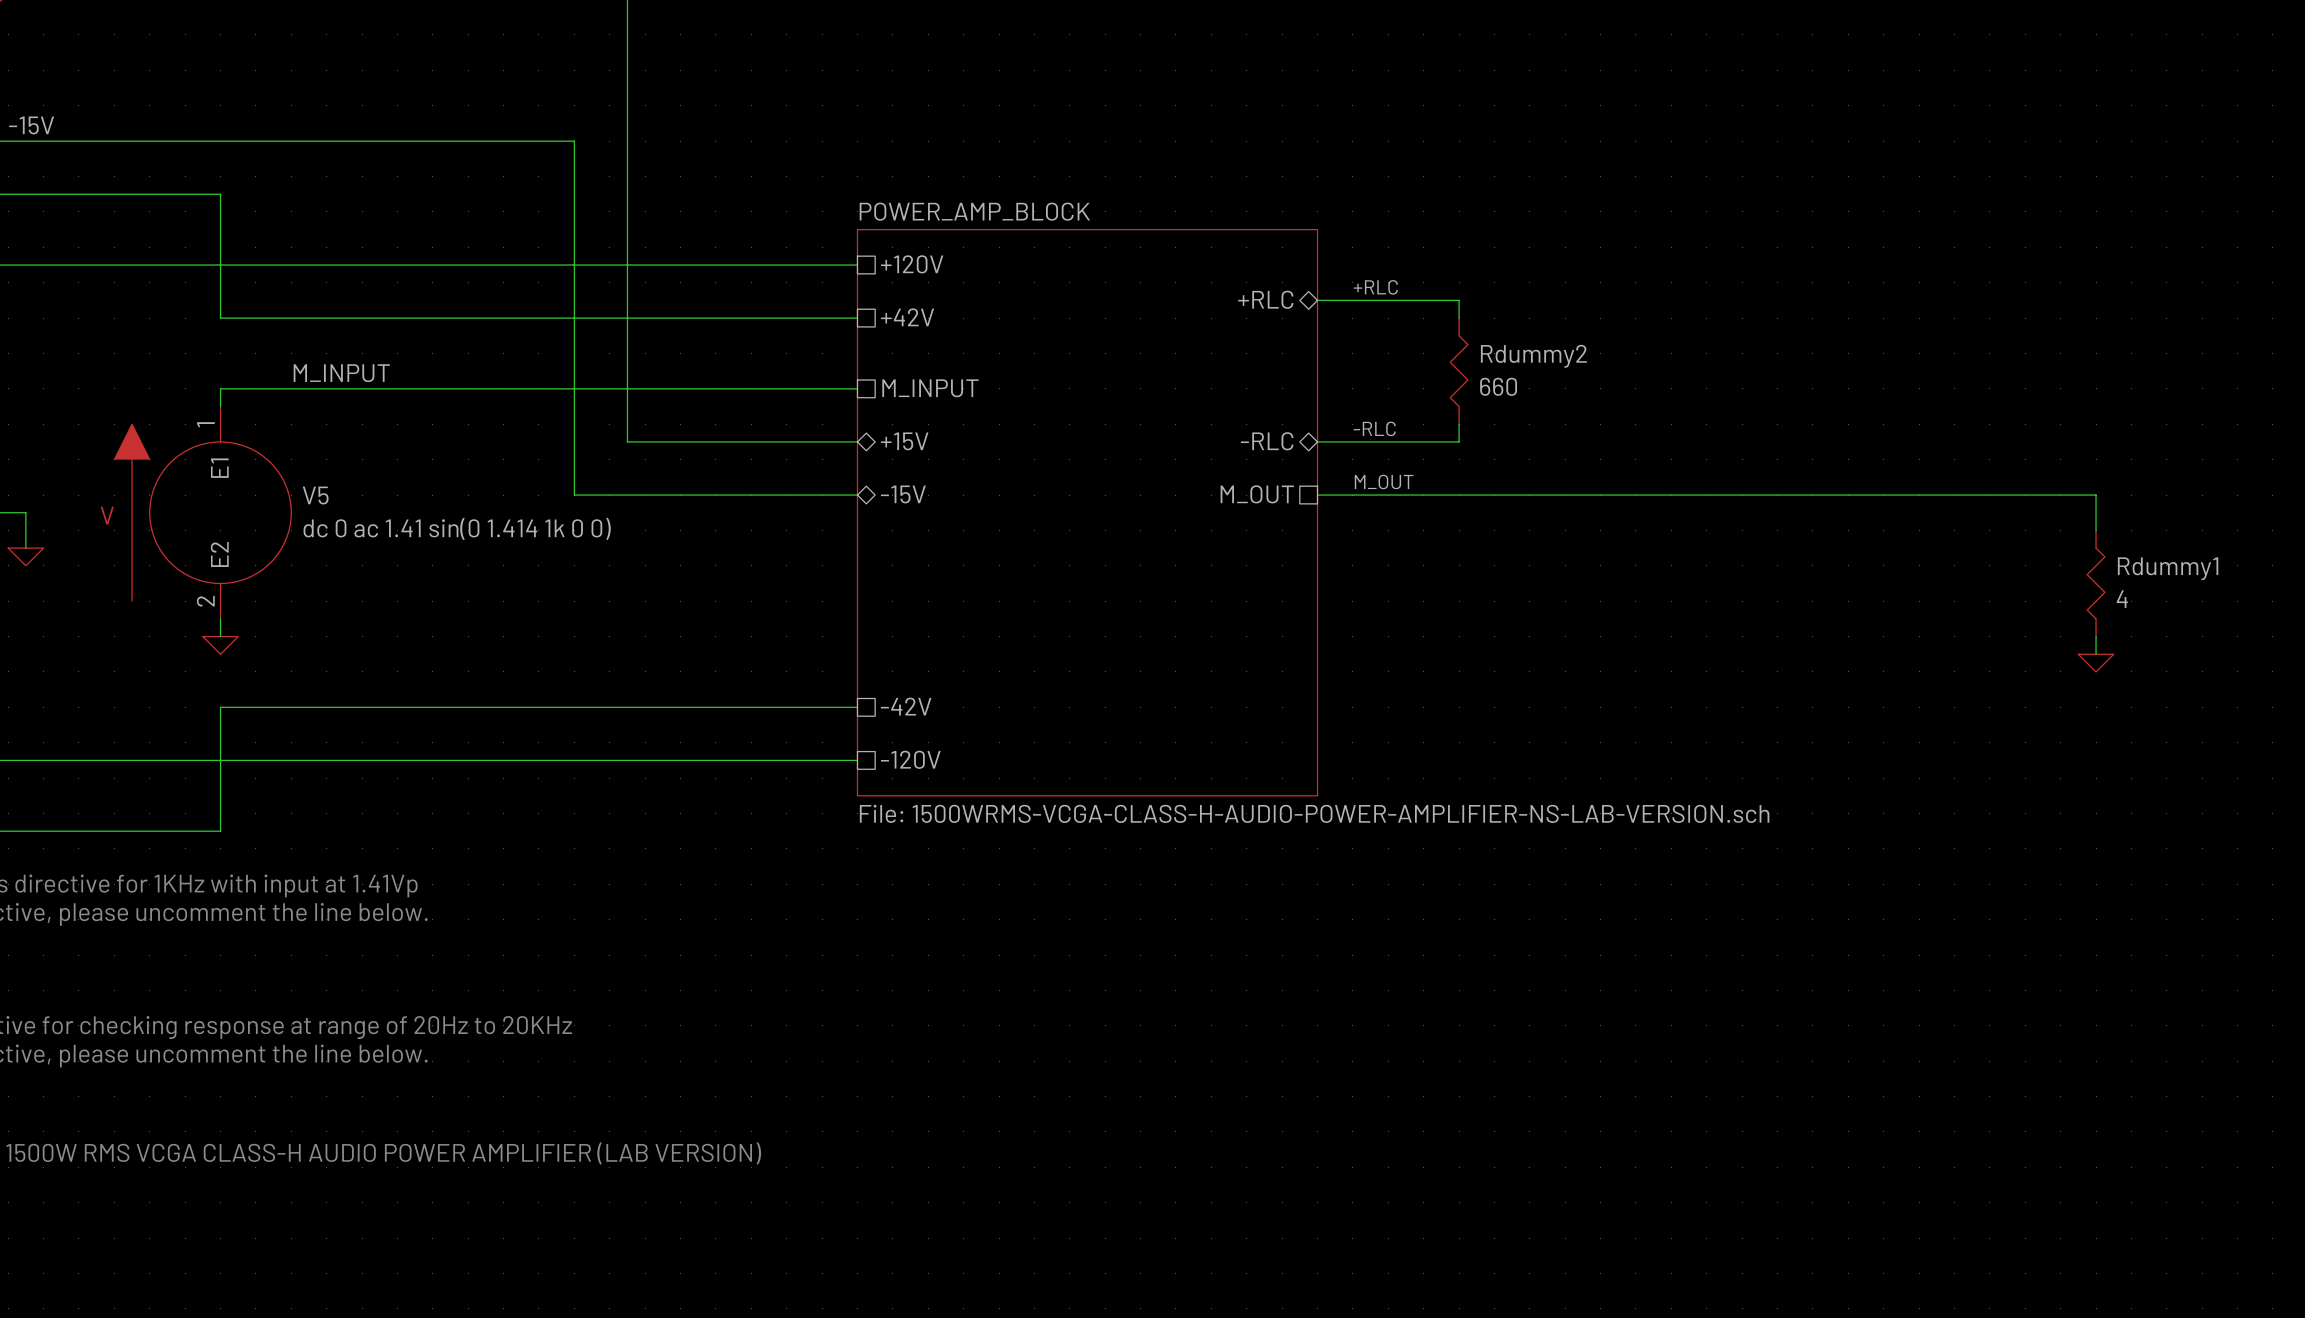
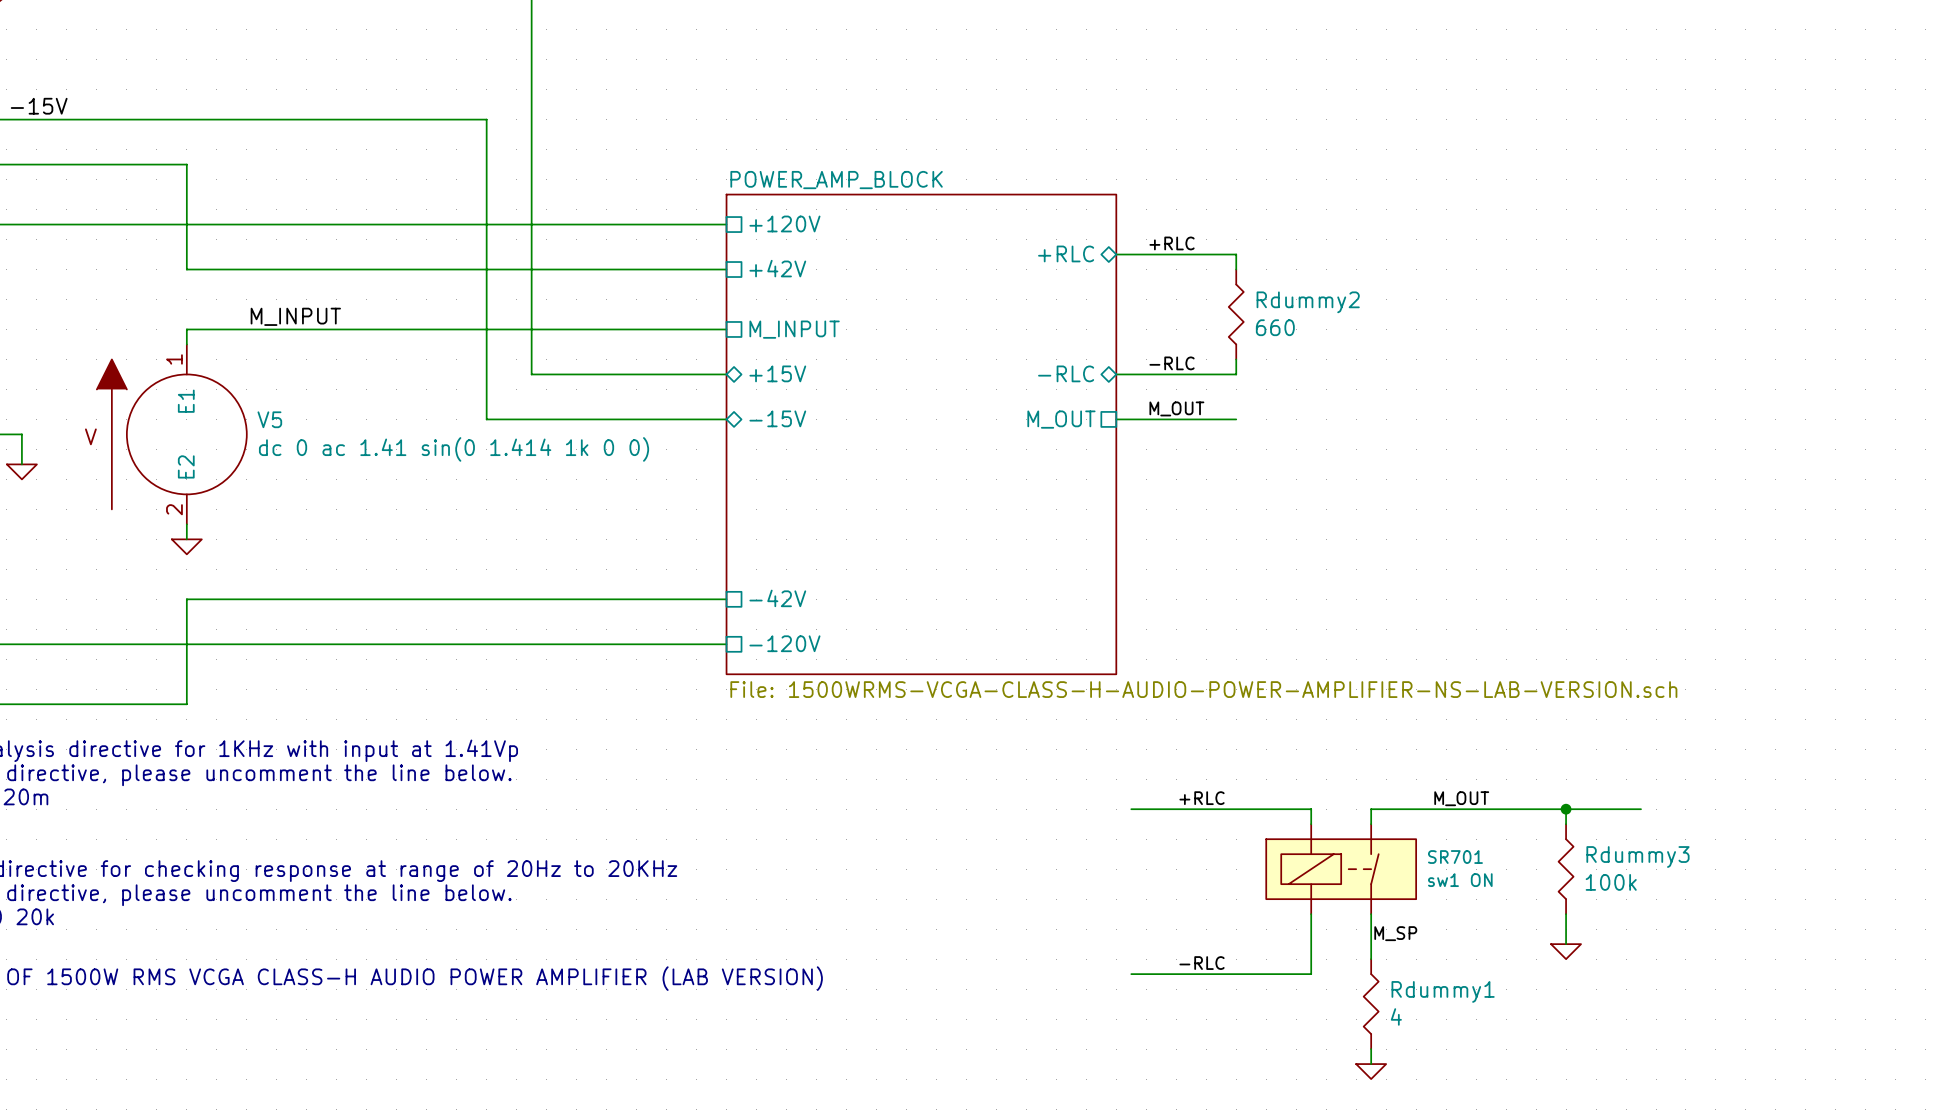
wire: (1459, 495) (2096, 495) (2096, 530) -> none
Rdummy1 position: (2096, 583) -> (1371, 1004)
wire: (2096, 636) (2096, 654) -> none
power symbol: (2096, 663) -> none
label: none -> +RLC (1202, 798)
label: none -> M_OUT (1461, 798)
wire: none -> (1131, 809) (1311, 809) (1311, 824)
wire: none -> (1566, 809) (1566, 824)
junction: none -> (1566, 809)
wire: none -> (1641, 809) (1371, 809) (1371, 824)
SR701: none -> sw1 ON (1341, 869)
Rdummy3: none -> 100k (1566, 869)
wire: none -> (1311, 914) (1311, 974) (1131, 974)
wire: none -> (1371, 914) (1371, 959)
wire: none -> (1566, 914) (1566, 944)
label: none -> M_SP (1395, 933)
power symbol: none -> (1566, 951)
label: none -> -RLC (1202, 963)
wire: none -> (1371, 1049) (1371, 1064)
power symbol: none -> (1371, 1071)

